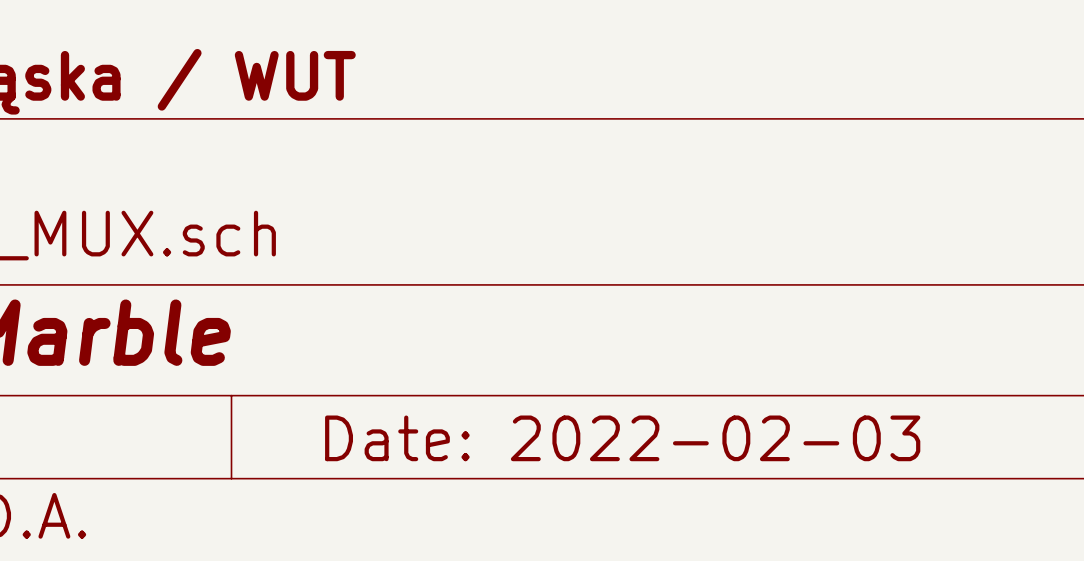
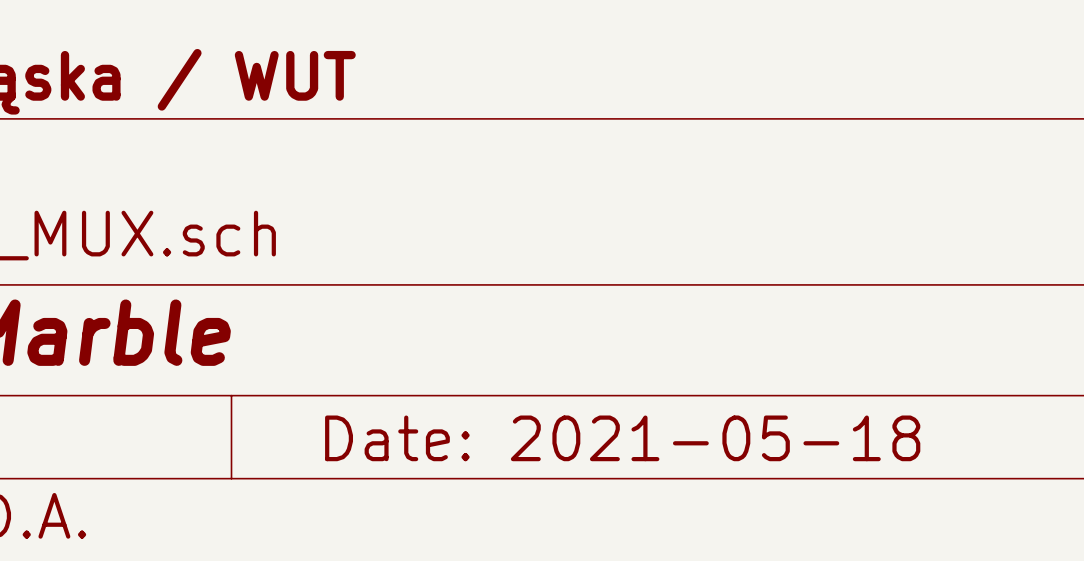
title block: Date: 2022-02-03 (622, 438) -> Date: 2021-05-18 (622, 438)

